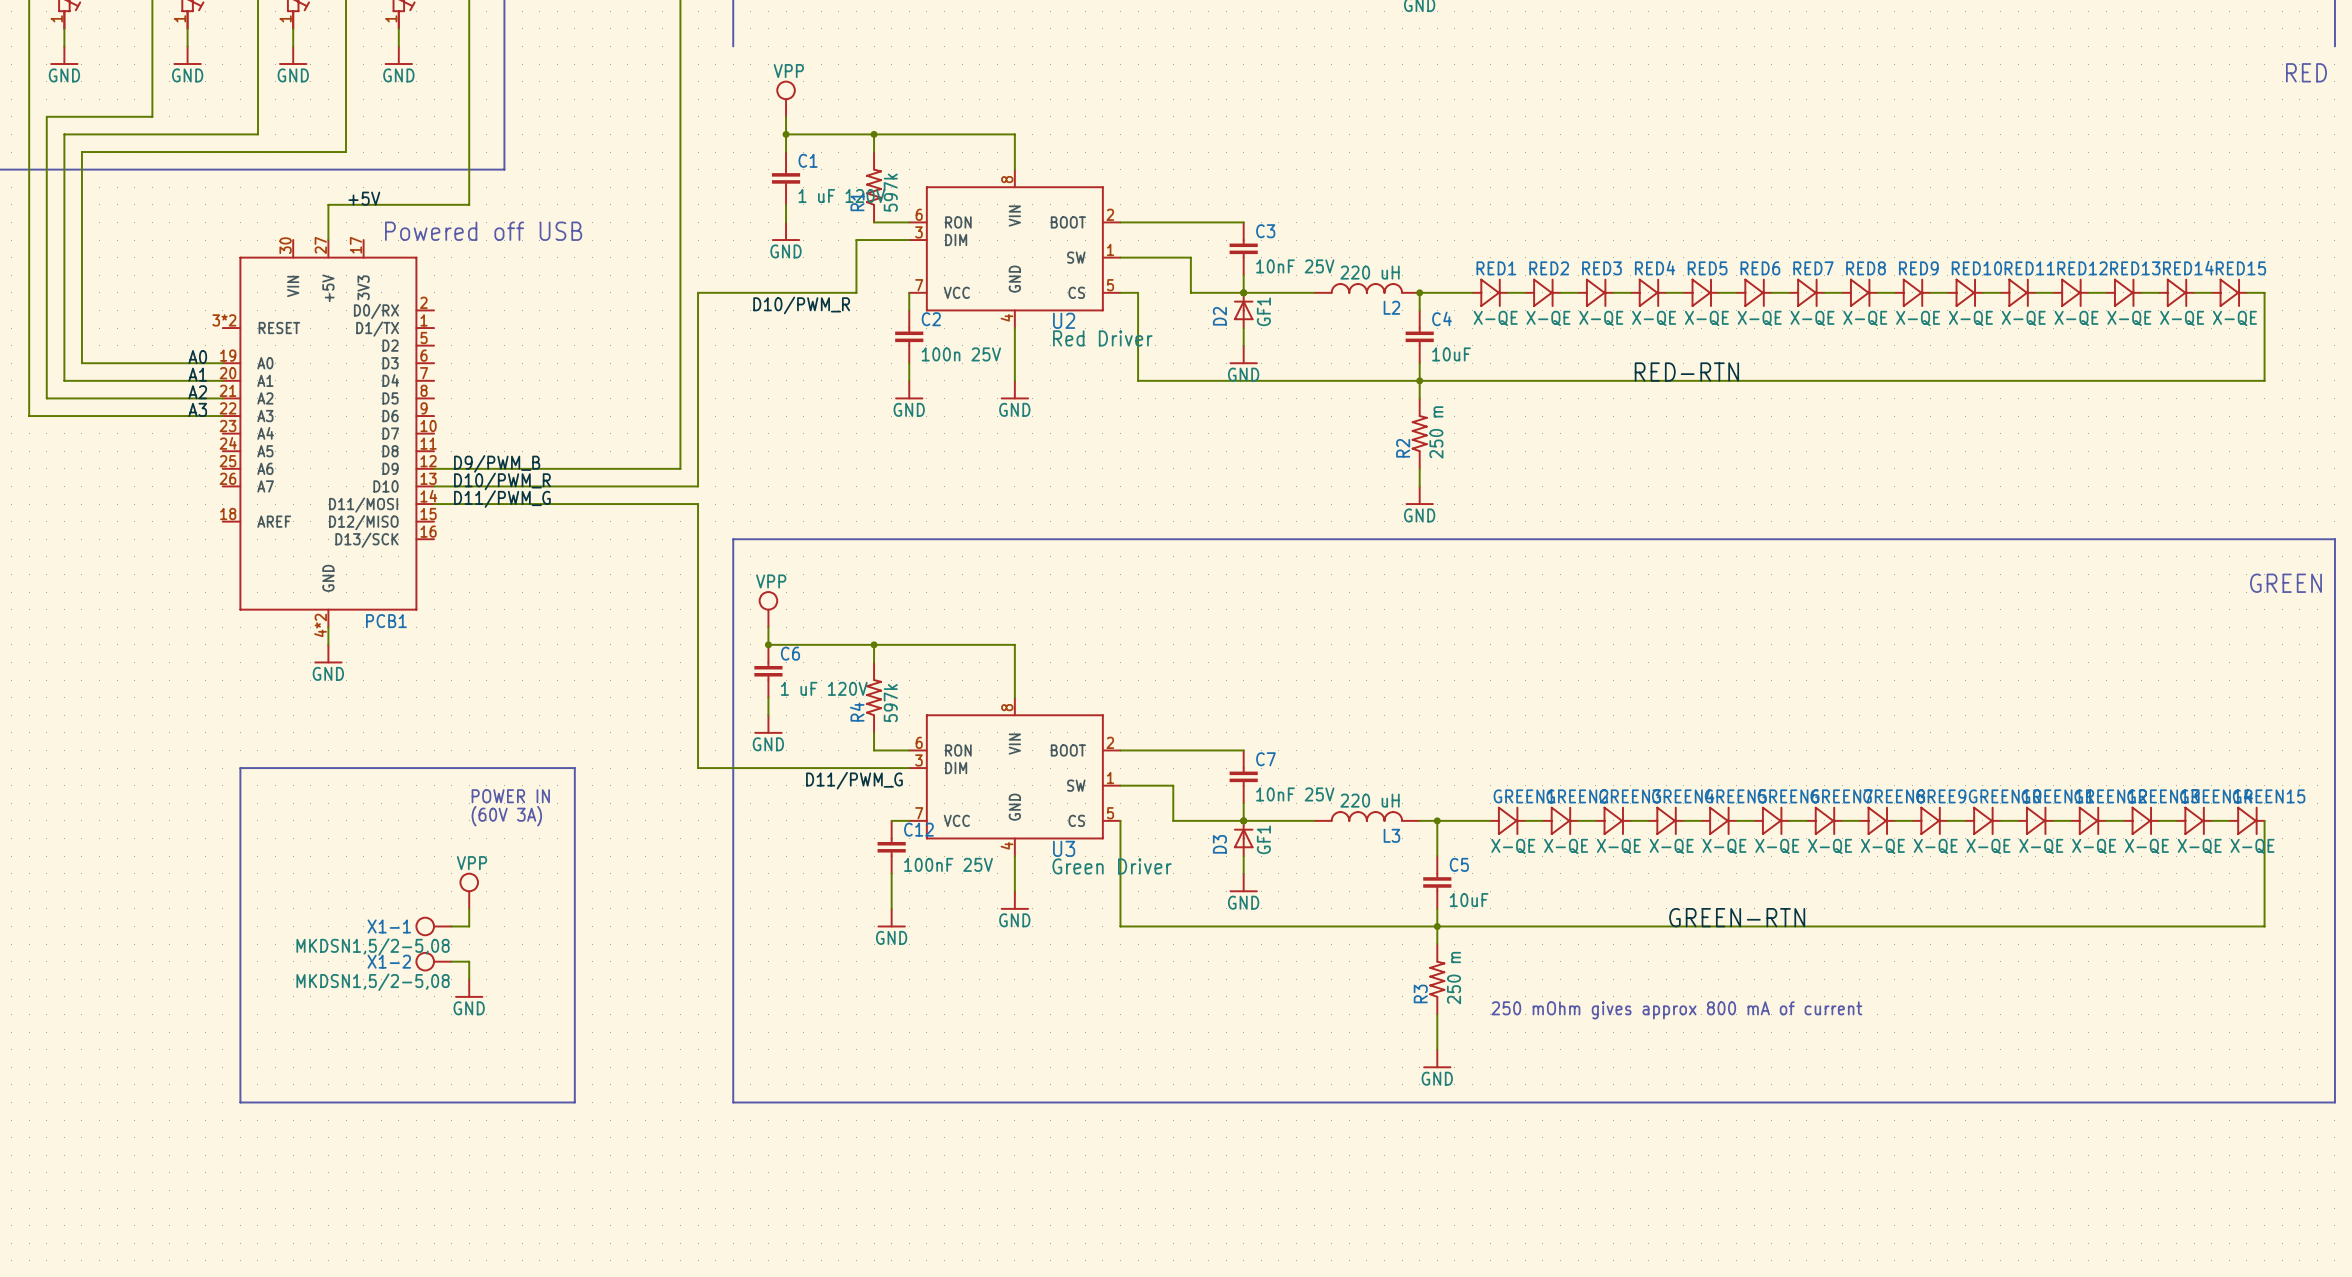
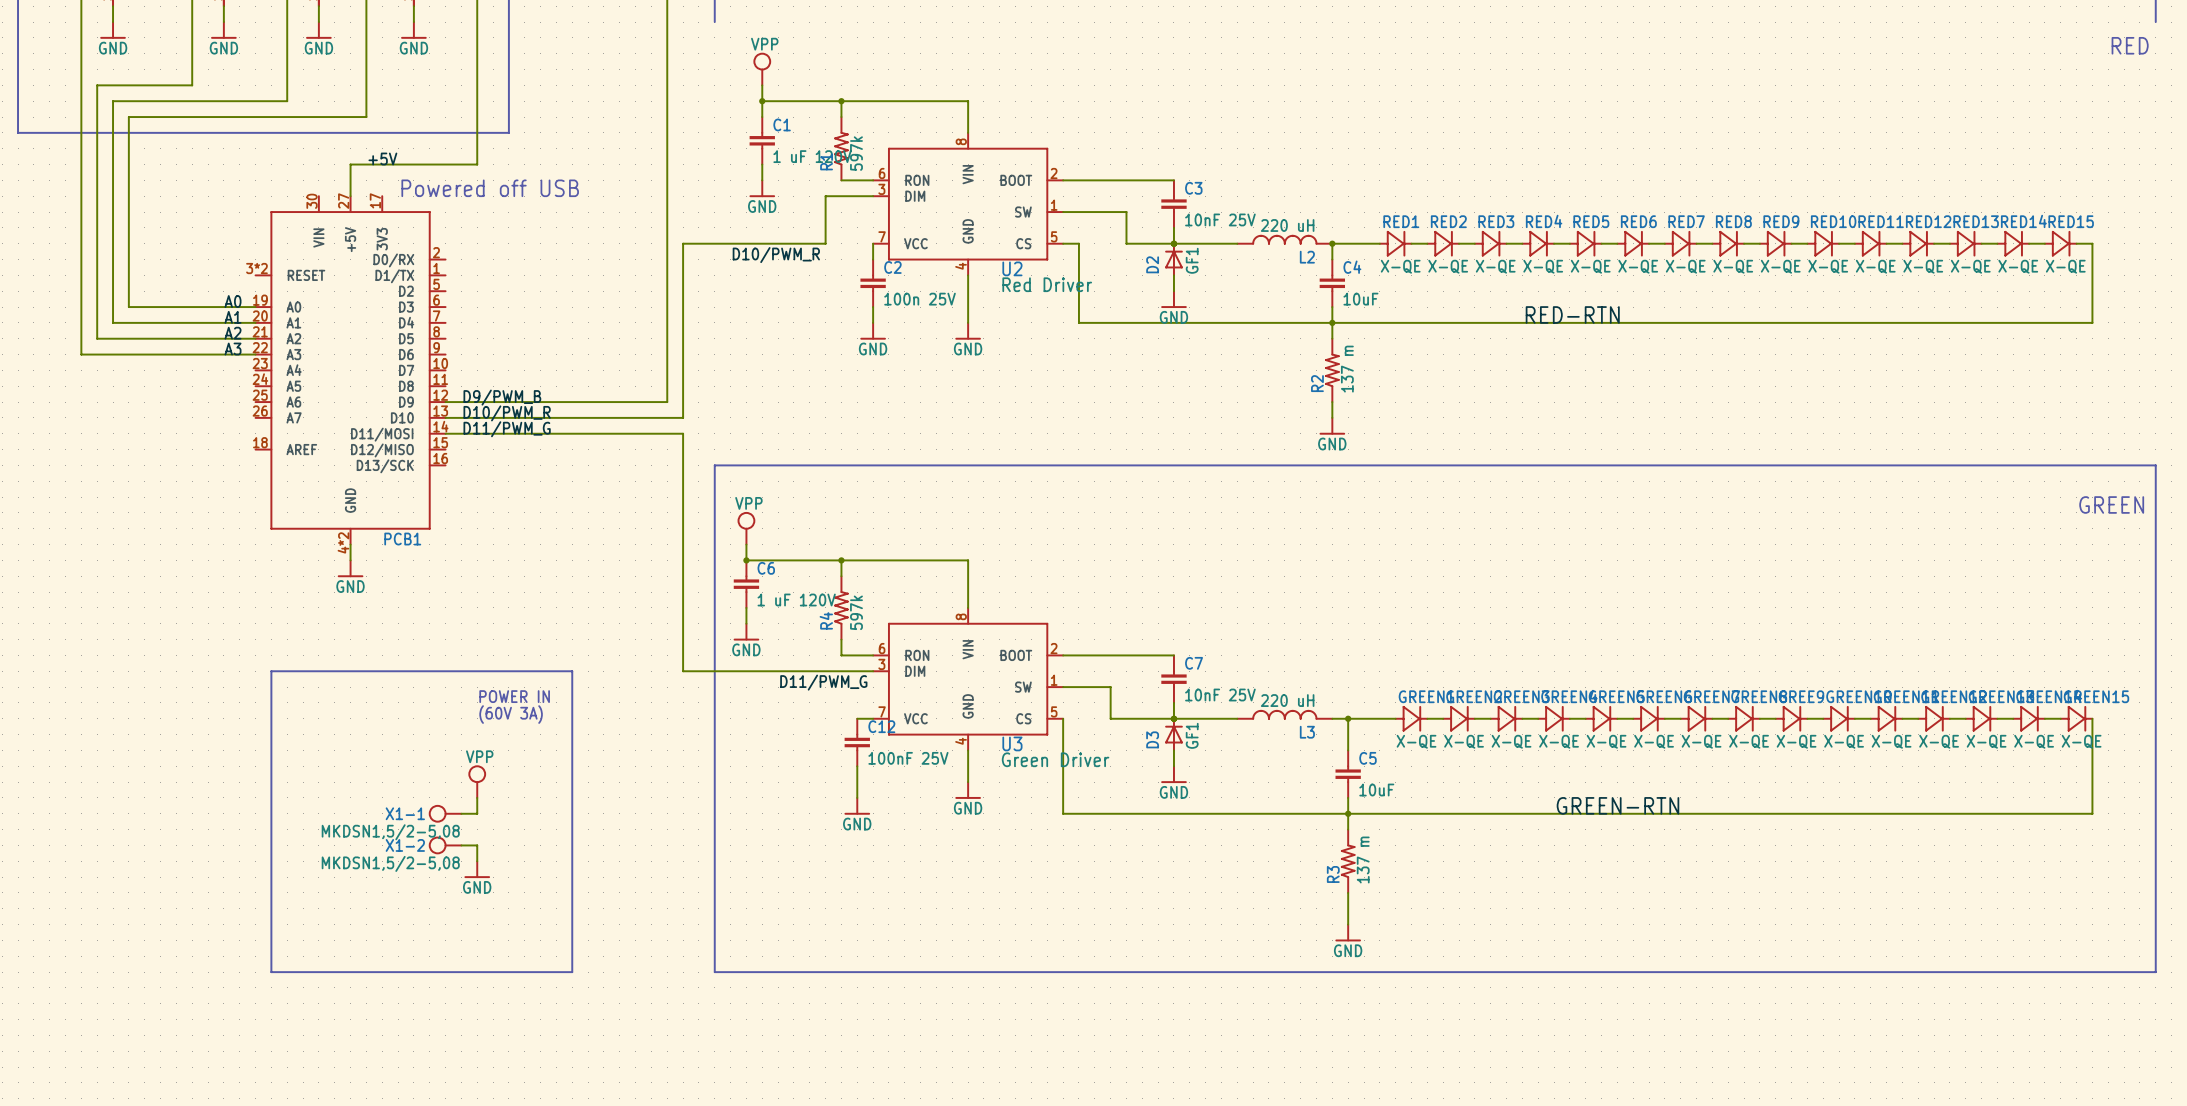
R2 value: 250 m (1436, 432) -> 137 m (1347, 369)
R3 value: 250 m (1454, 978) -> 137 m (1363, 859)
text: 250 mOhm gives approx 800 mA of current (1676, 1010) -> none

